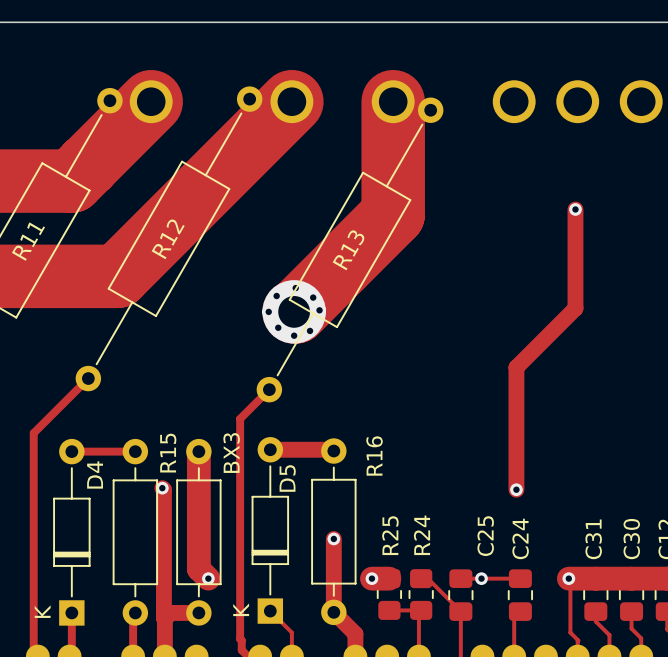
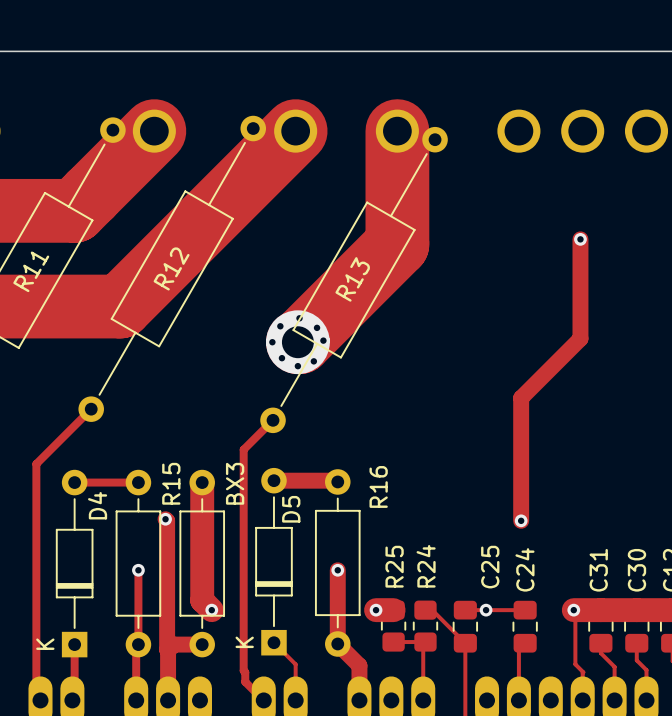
track: none -> (138, 570) (138, 644)
via: none -> (138, 570)

